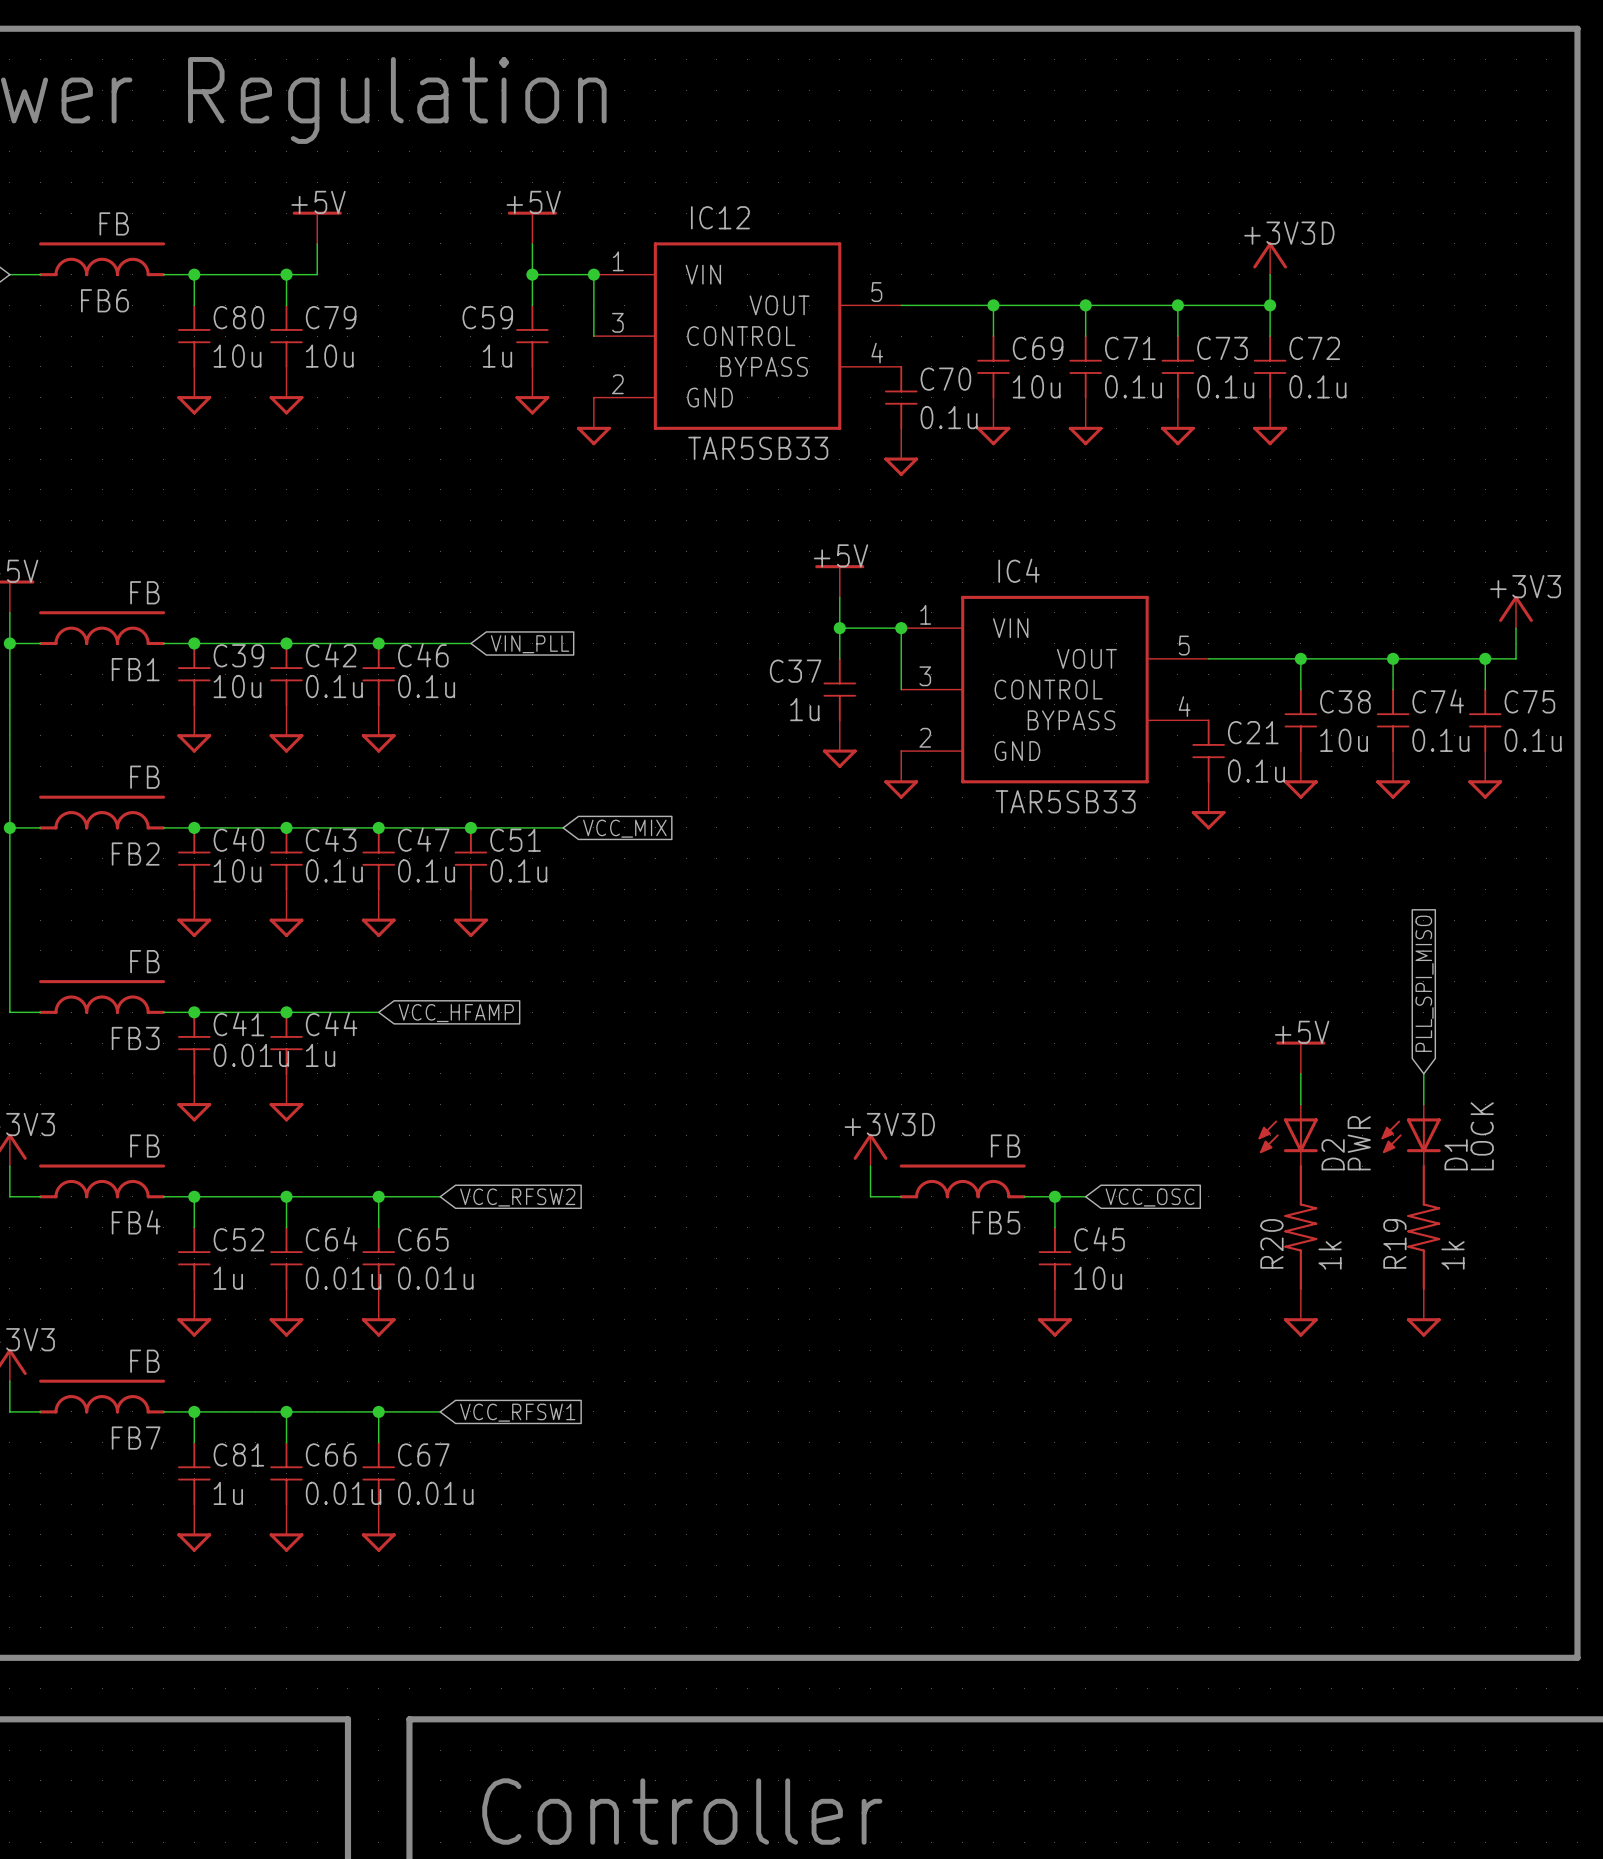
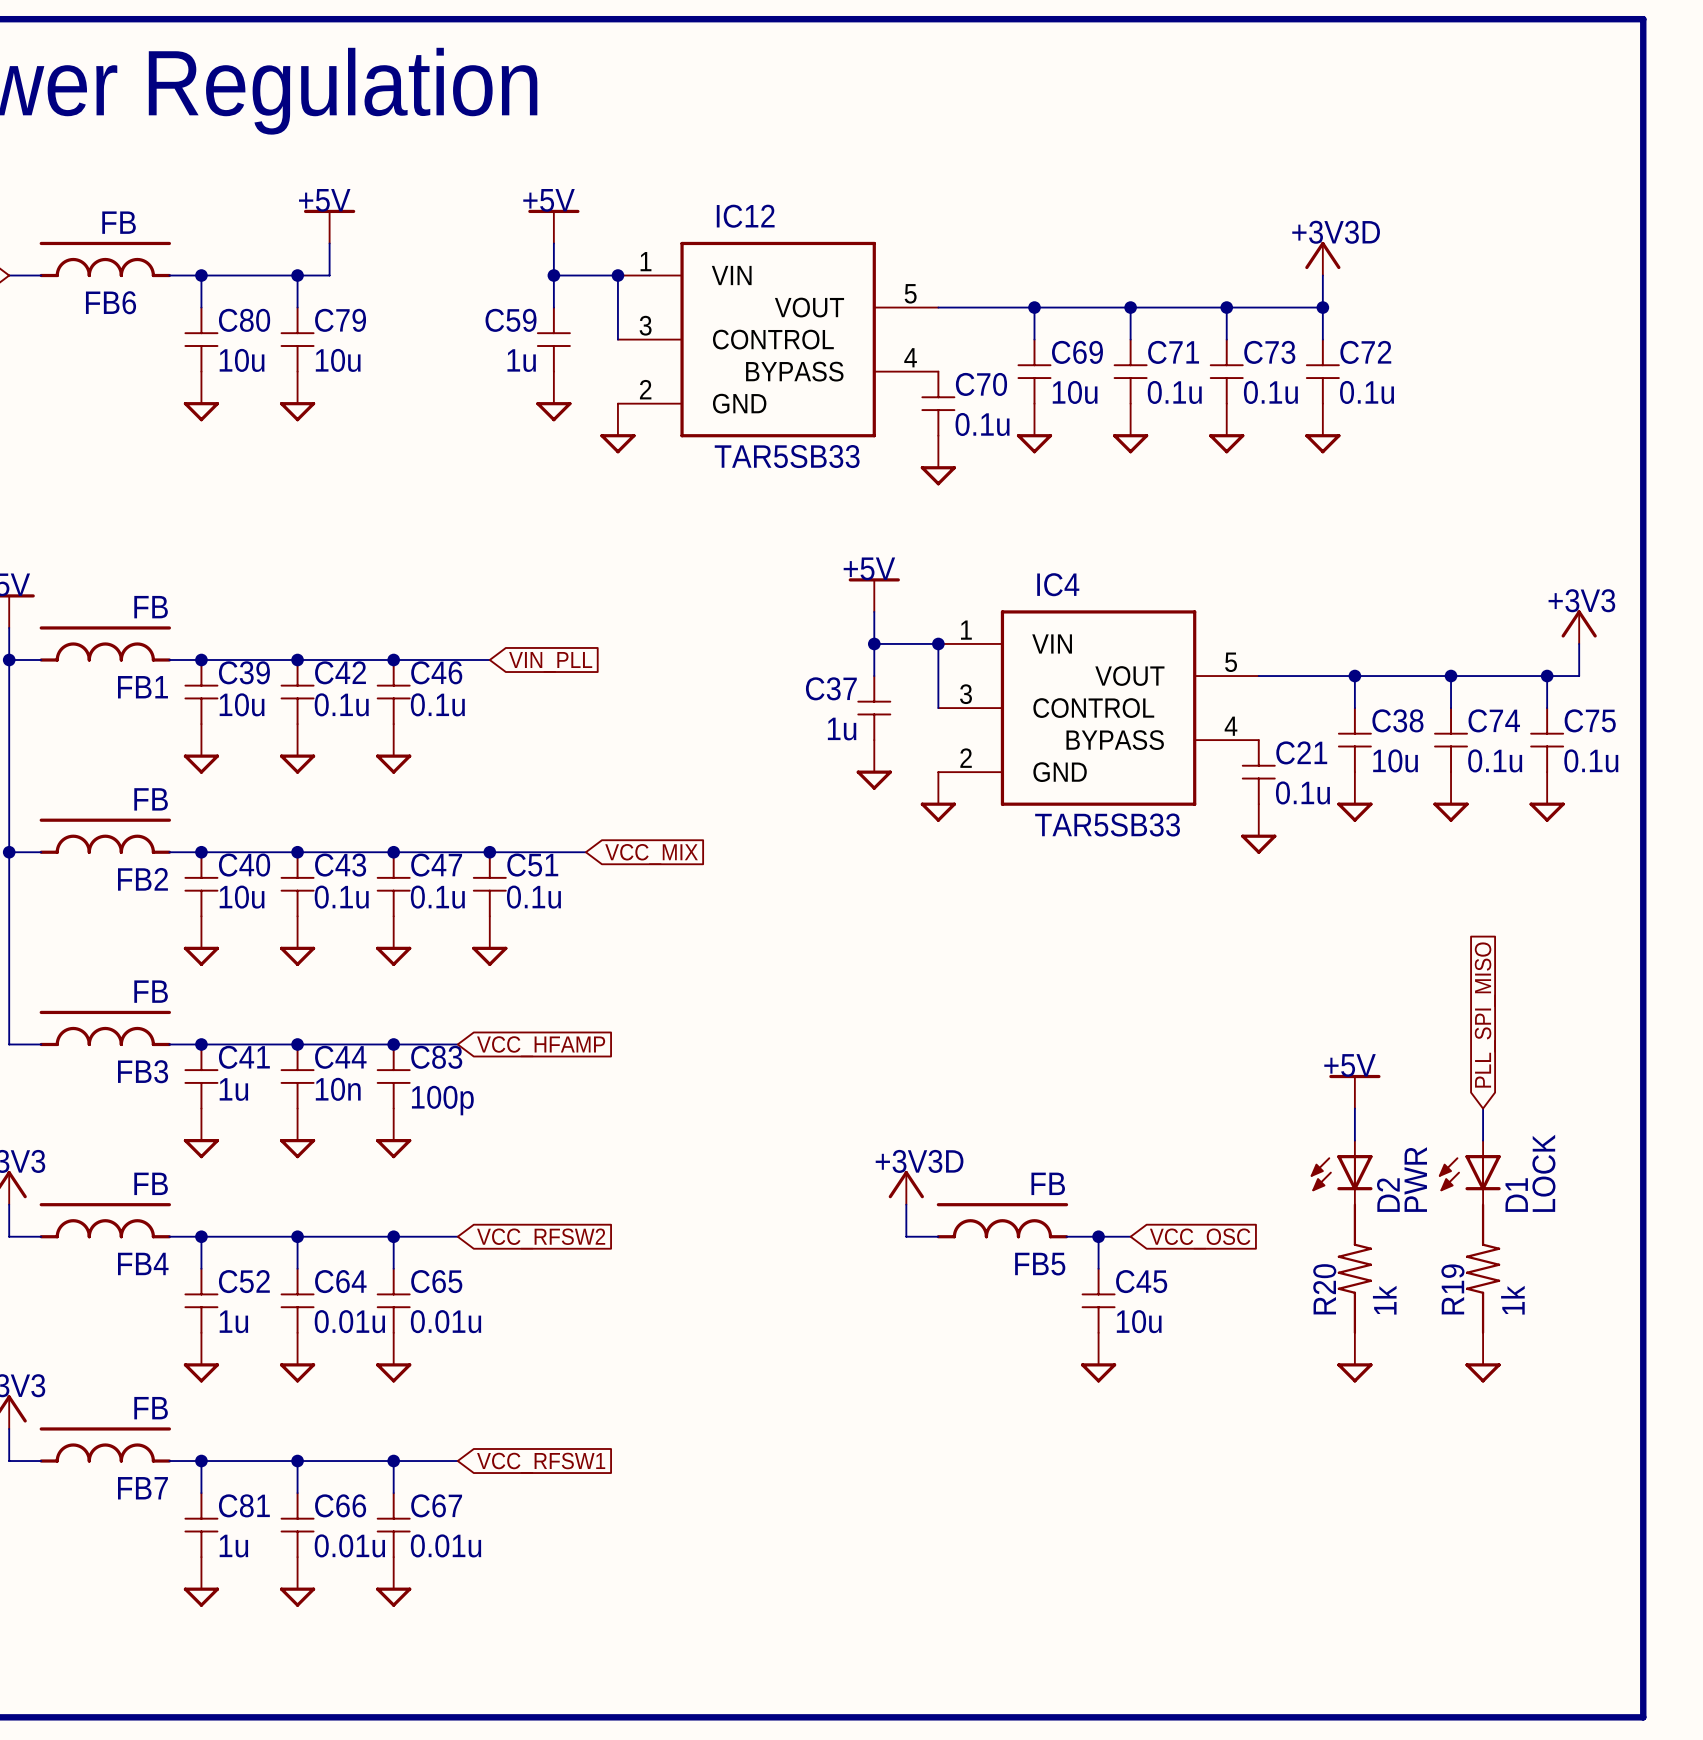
wire: none -> (393, 1044) (457, 1044)
junction: none -> (393, 1044)
global label position: VCC_HFAMP (456, 1013) -> VCC_HFAMP (541, 1046)
C83: none -> 100p (393, 1076)
C41 value: 0.01u (251, 1055) -> 1u (233, 1089)
C44 value: 1u (320, 1055) -> 10n (338, 1089)
power symbol: none -> (393, 1133)

